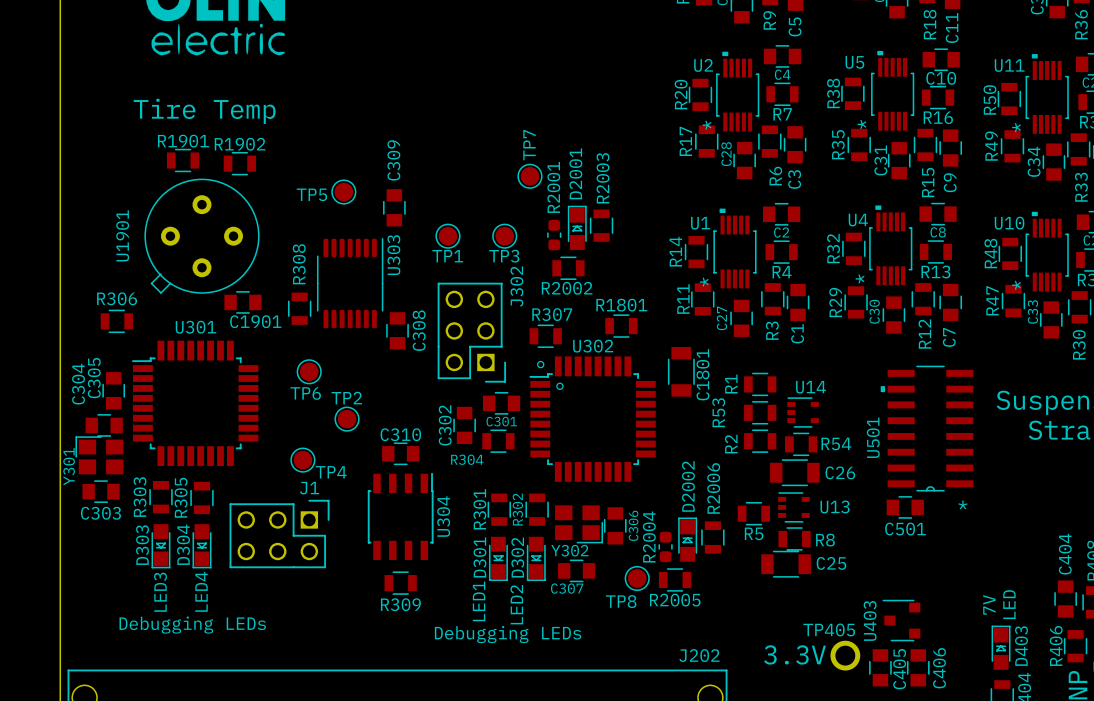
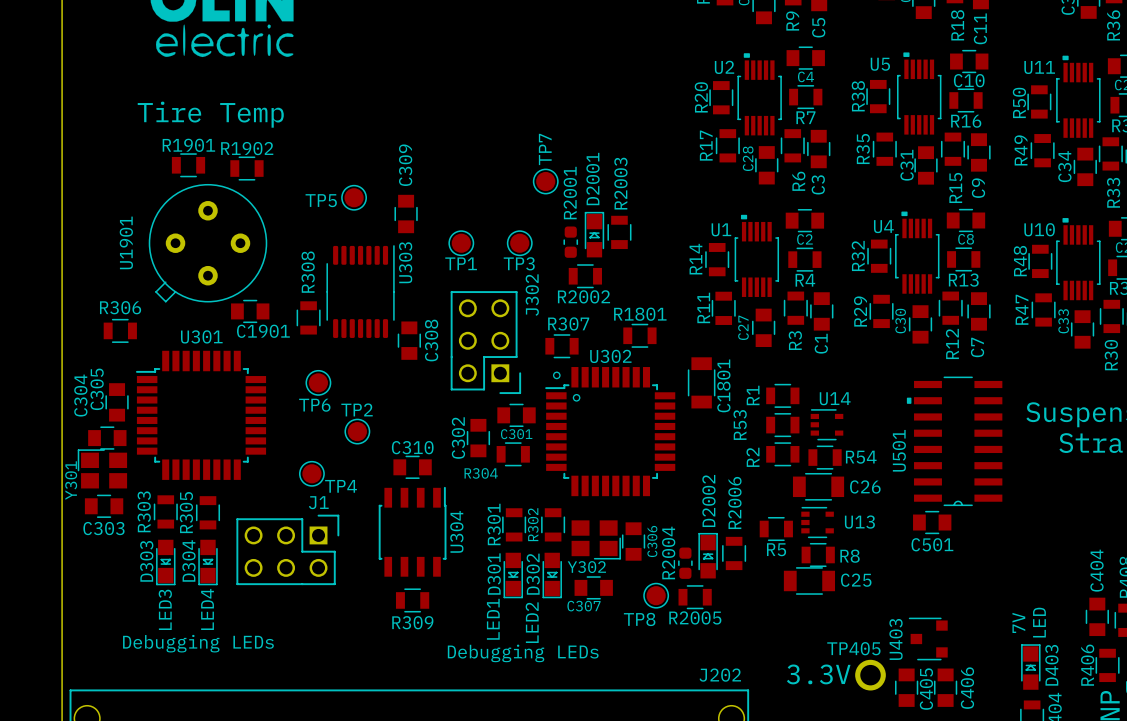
U5 text: * (861, 124) -> none
U2 text: * (707, 125) -> none
U11 text: * (1016, 127) -> none
U4 text: * (860, 278) -> none
U1 text: * (704, 282) -> none
U10 text: * (1016, 285) -> none
U501 text: * (962, 504) -> none

